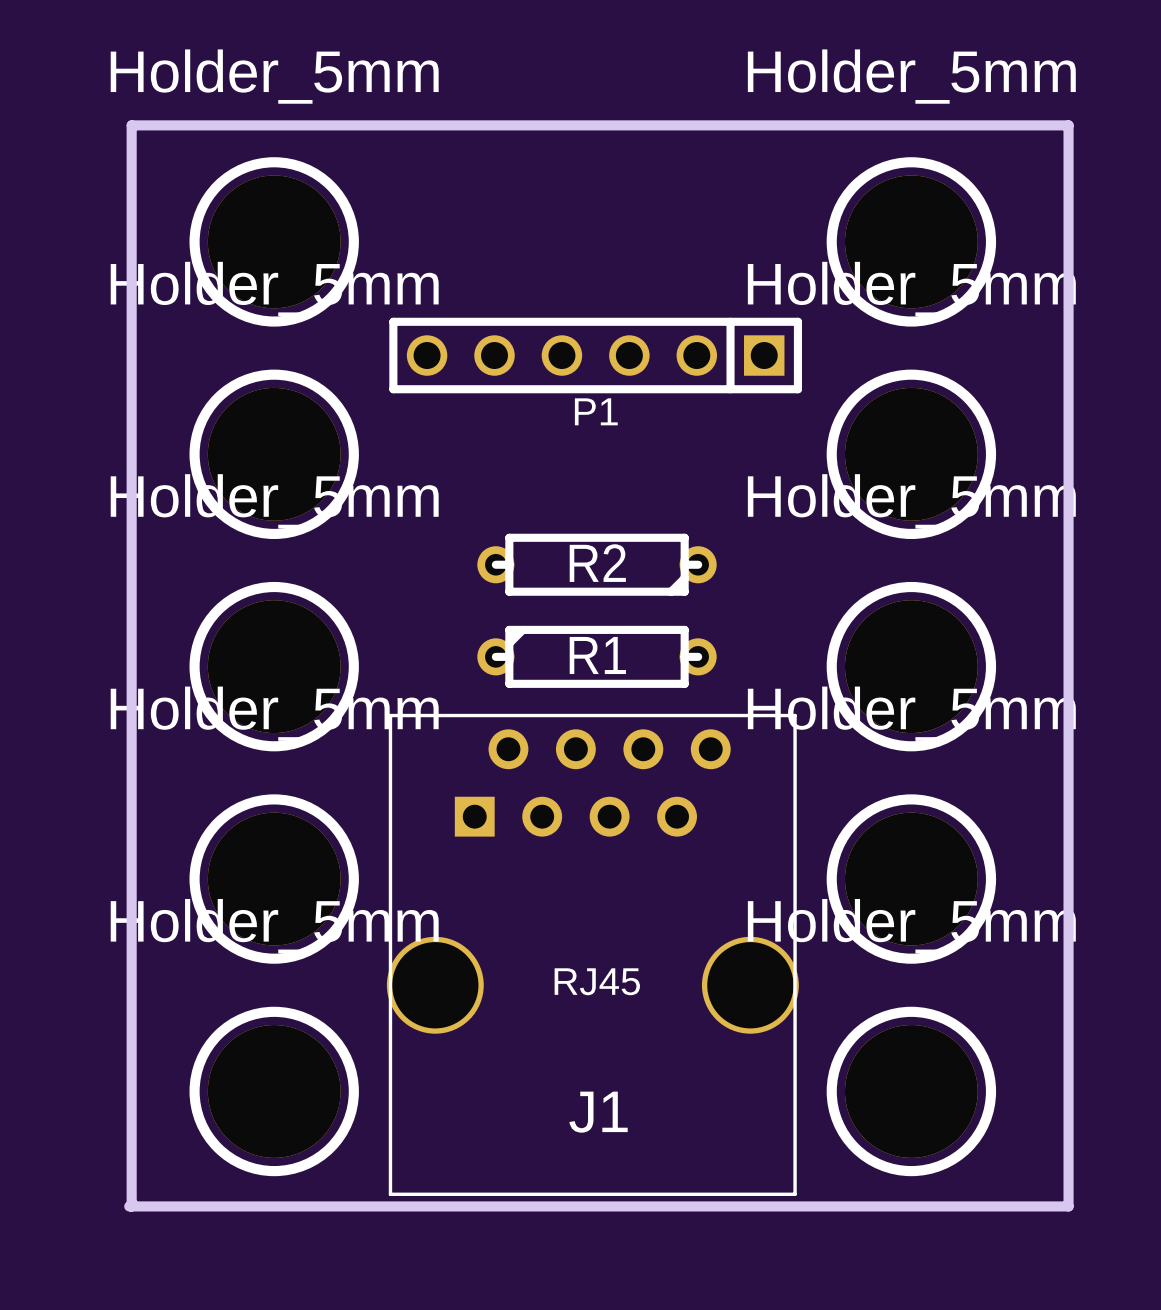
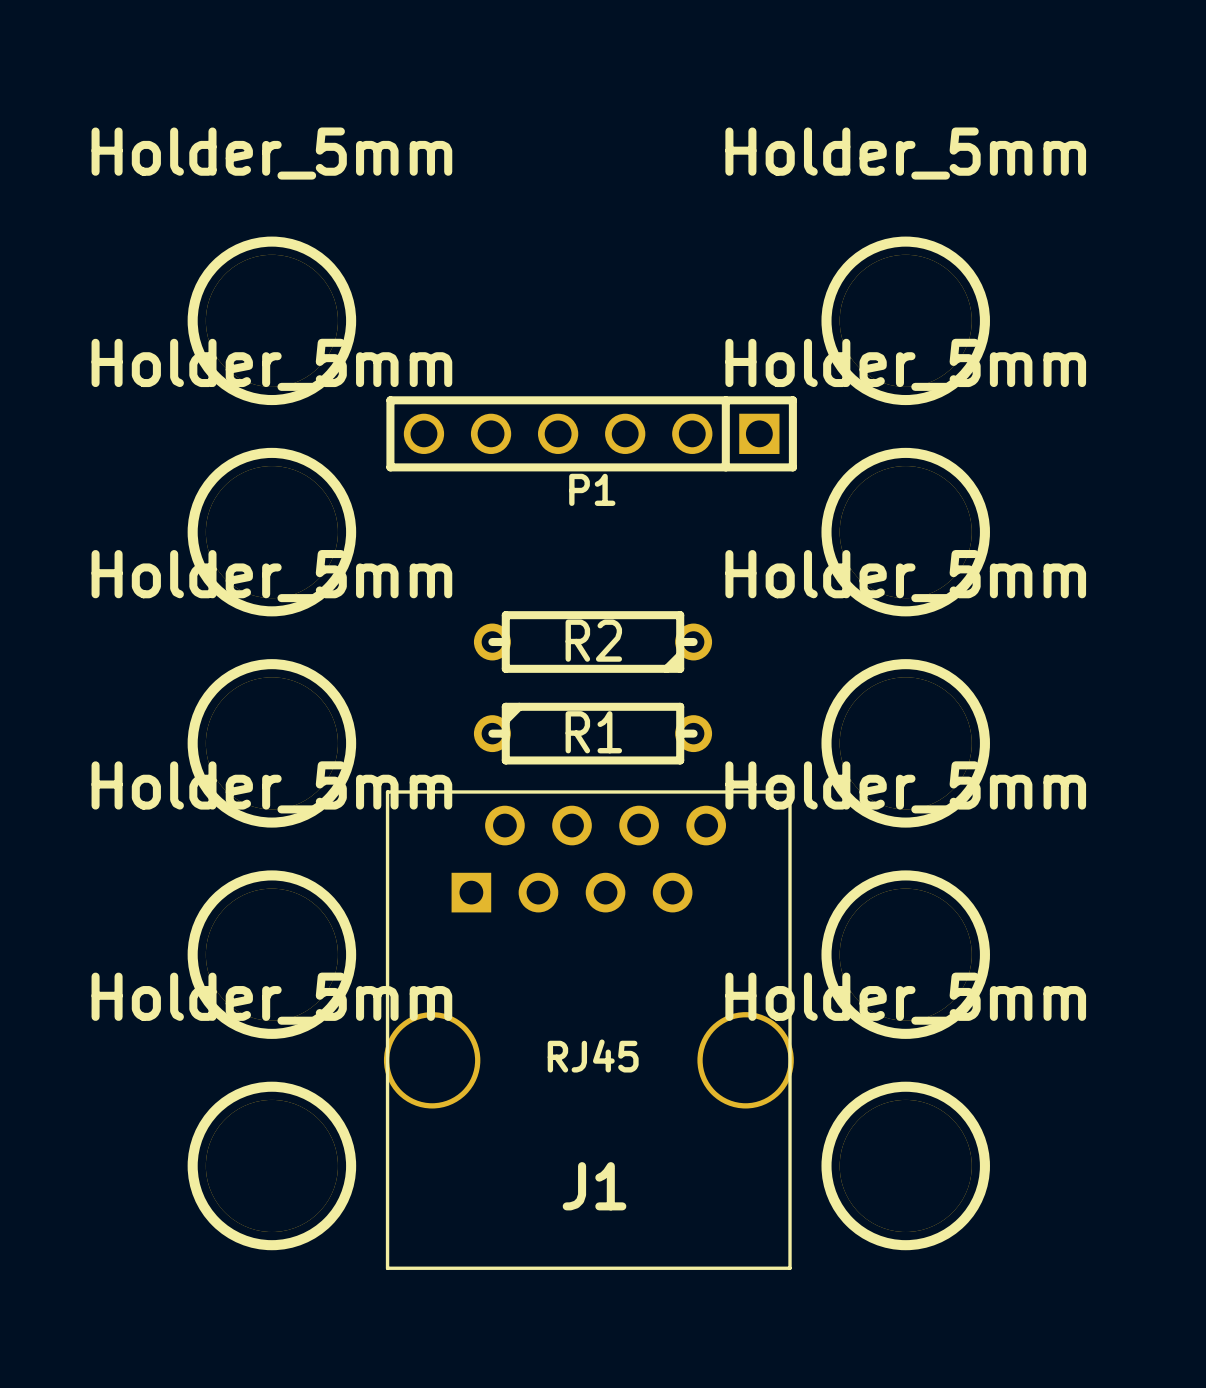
board edge: (129, 1206) (1068, 1206) (1068, 125) (131, 125) (131, 1206) -> none

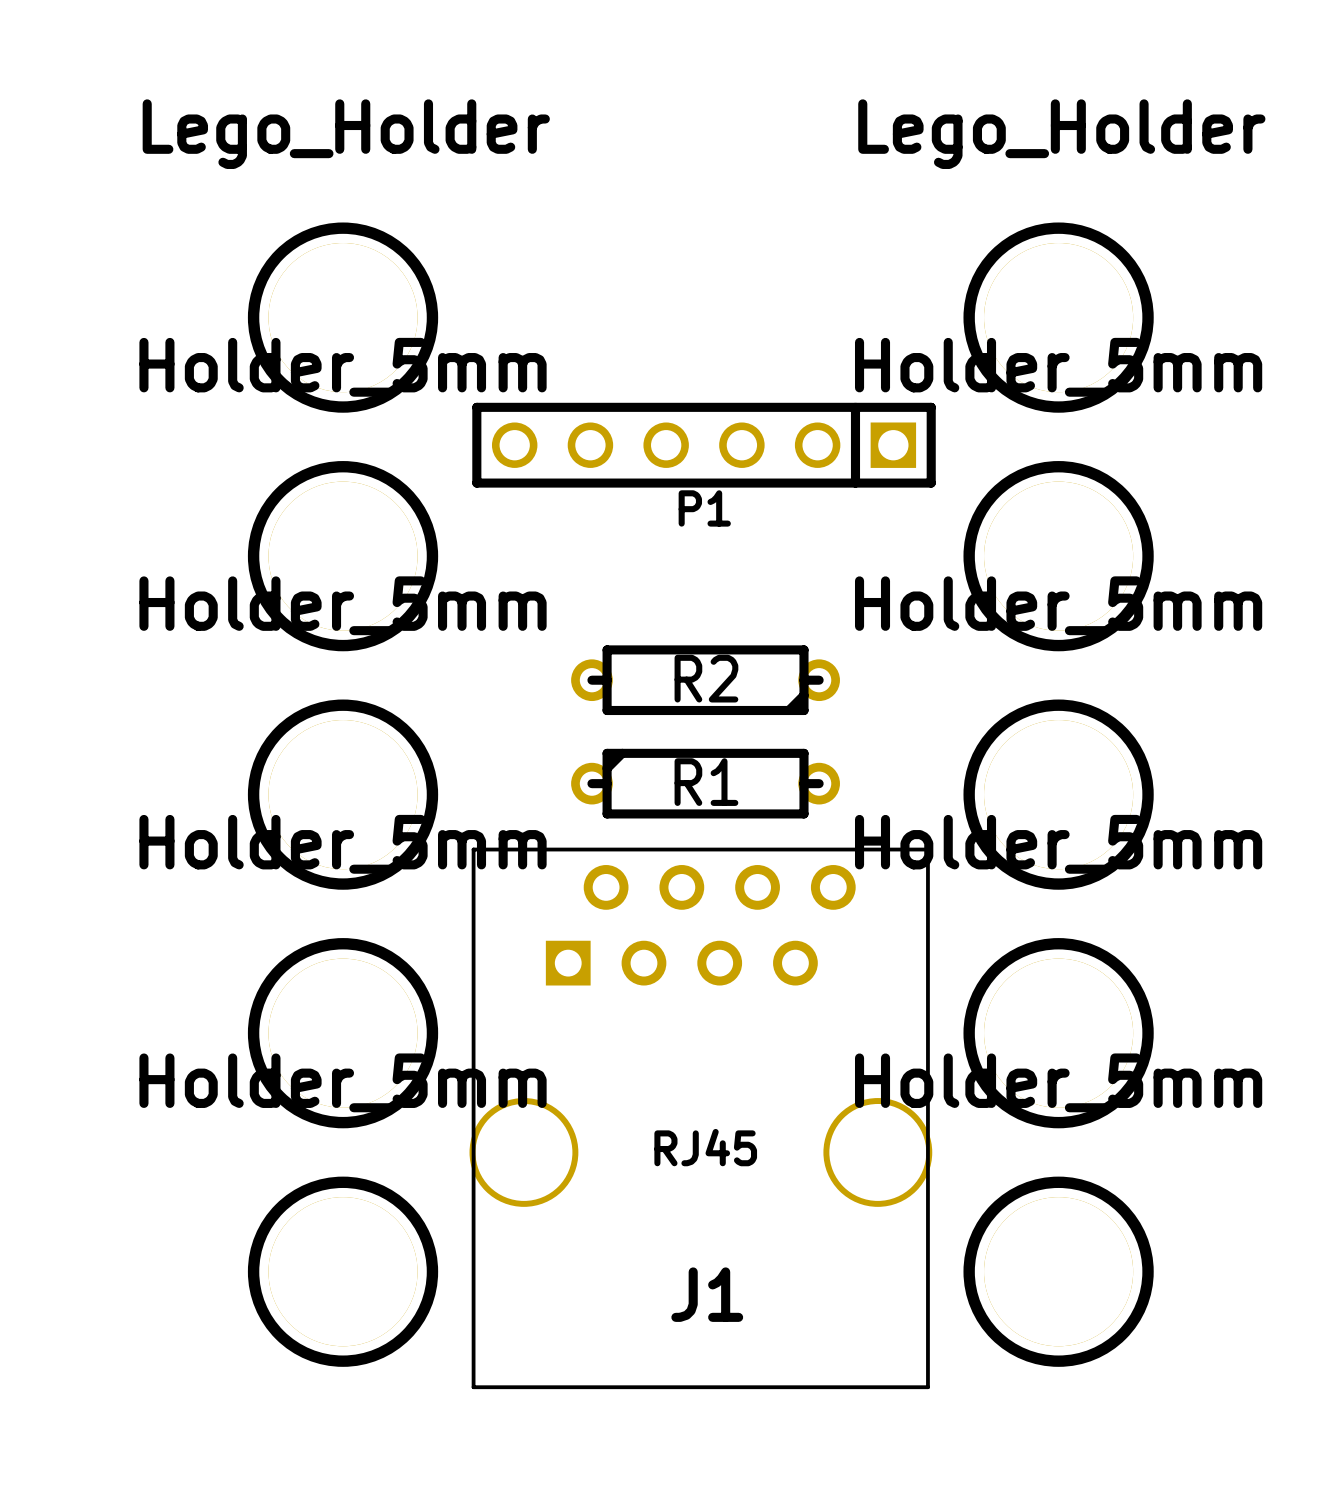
Holder_5mm name: Holder_5mm (271, 153) -> Lego_Holder (346, 134)
Holder_5mm name: Holder_5mm (905, 153) -> Lego_Holder (1061, 134)

